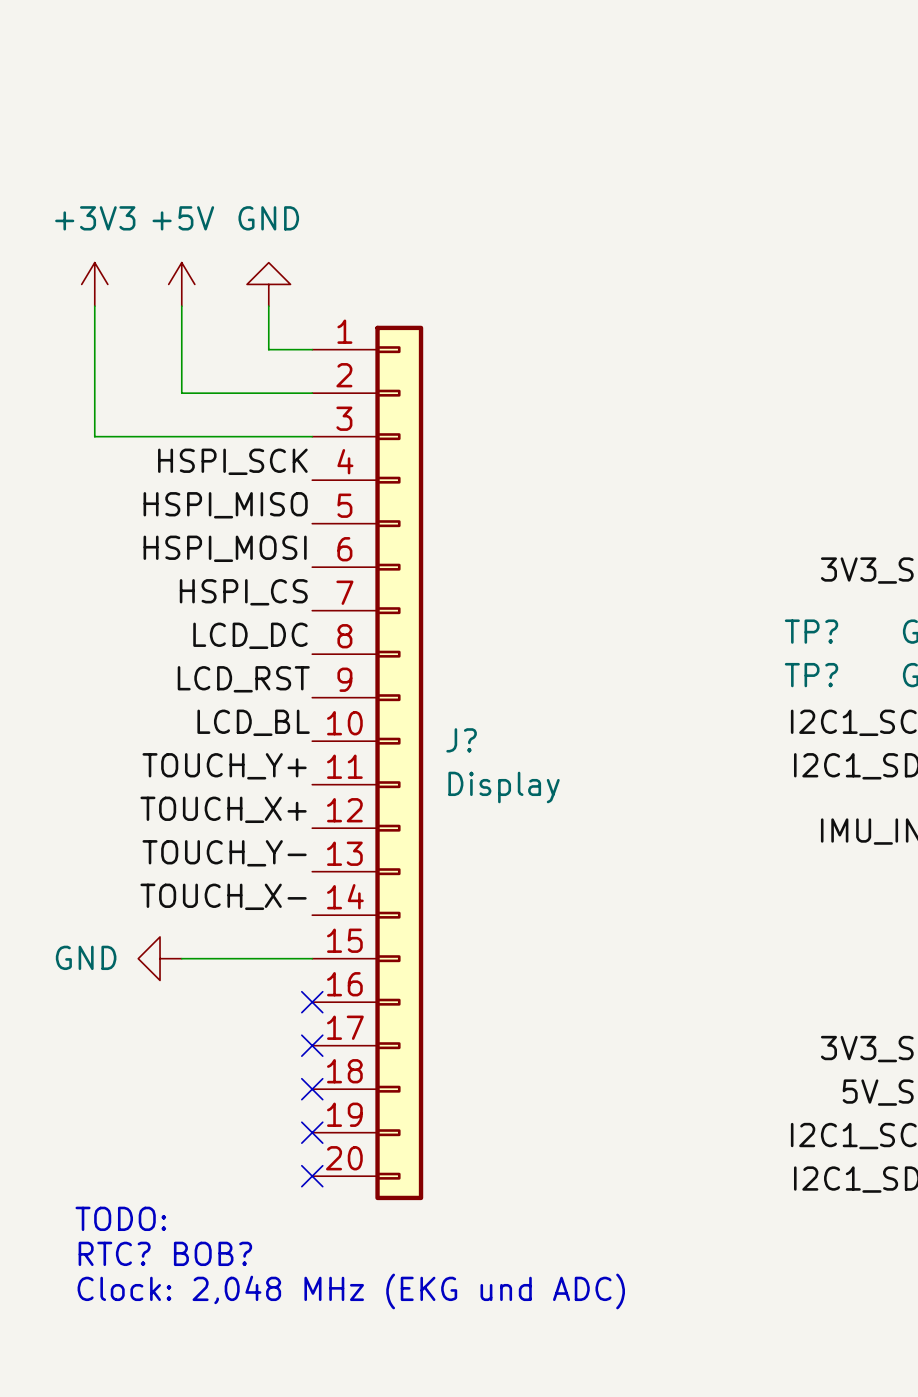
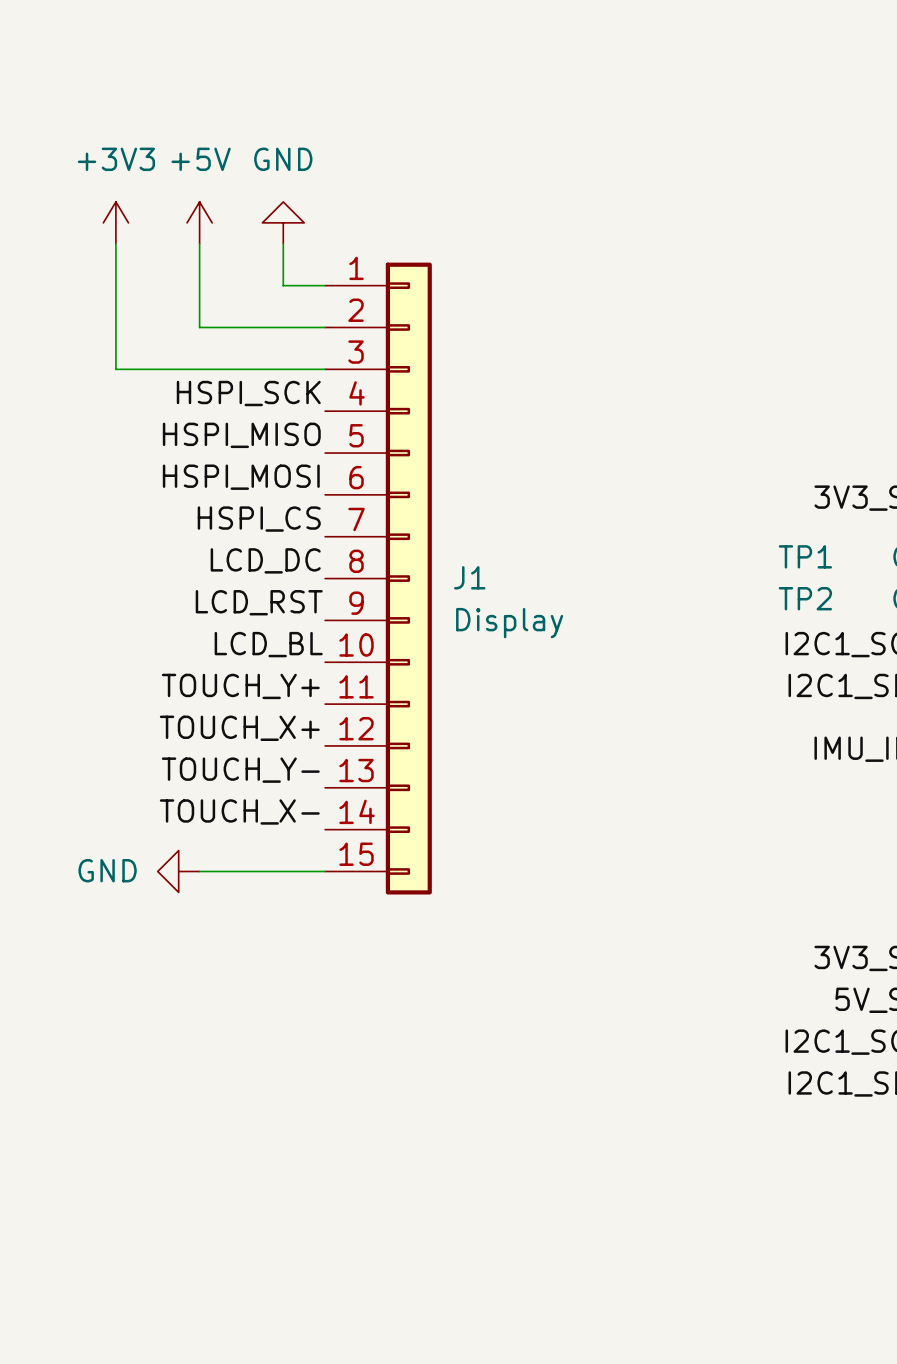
TP? name: TP? (811, 631) -> TP1 (805, 556)
J1: none -> Display (378, 578)
TP? name: TP? (811, 675) -> TP2 (805, 598)
J?: Display (367, 762) -> none
no-connect mark: (312, 1002) -> none
no-connect mark: (312, 1045) -> none
no-connect mark: (312, 1089) -> none
no-connect mark: (312, 1132) -> none
no-connect mark: (312, 1176) -> none
text: TODO: (120, 1218) -> none
text: RTC? BOB? (165, 1253) -> none
text: Clock: 2,048 MHz (EKG und ADC) (351, 1291) -> none

